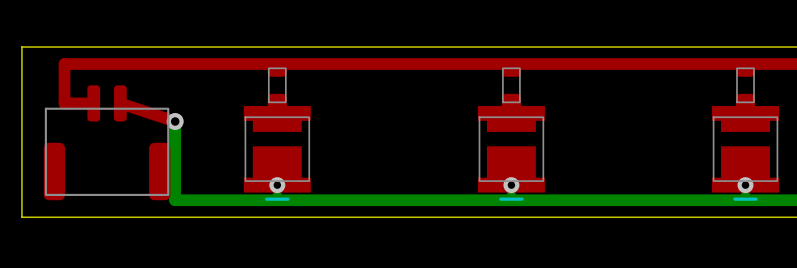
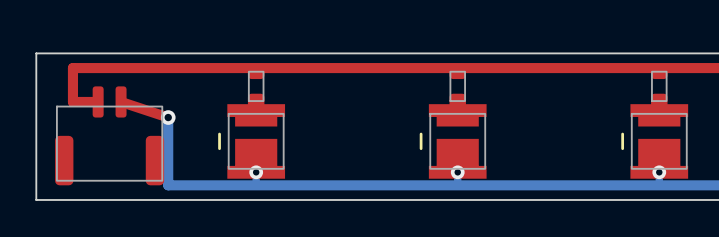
part footprint: [243, 105, 311, 201] -> [218, 104, 286, 179]
part footprint: [477, 105, 545, 201] -> [419, 104, 487, 179]
part footprint: [711, 105, 780, 201] -> [621, 104, 689, 179]

